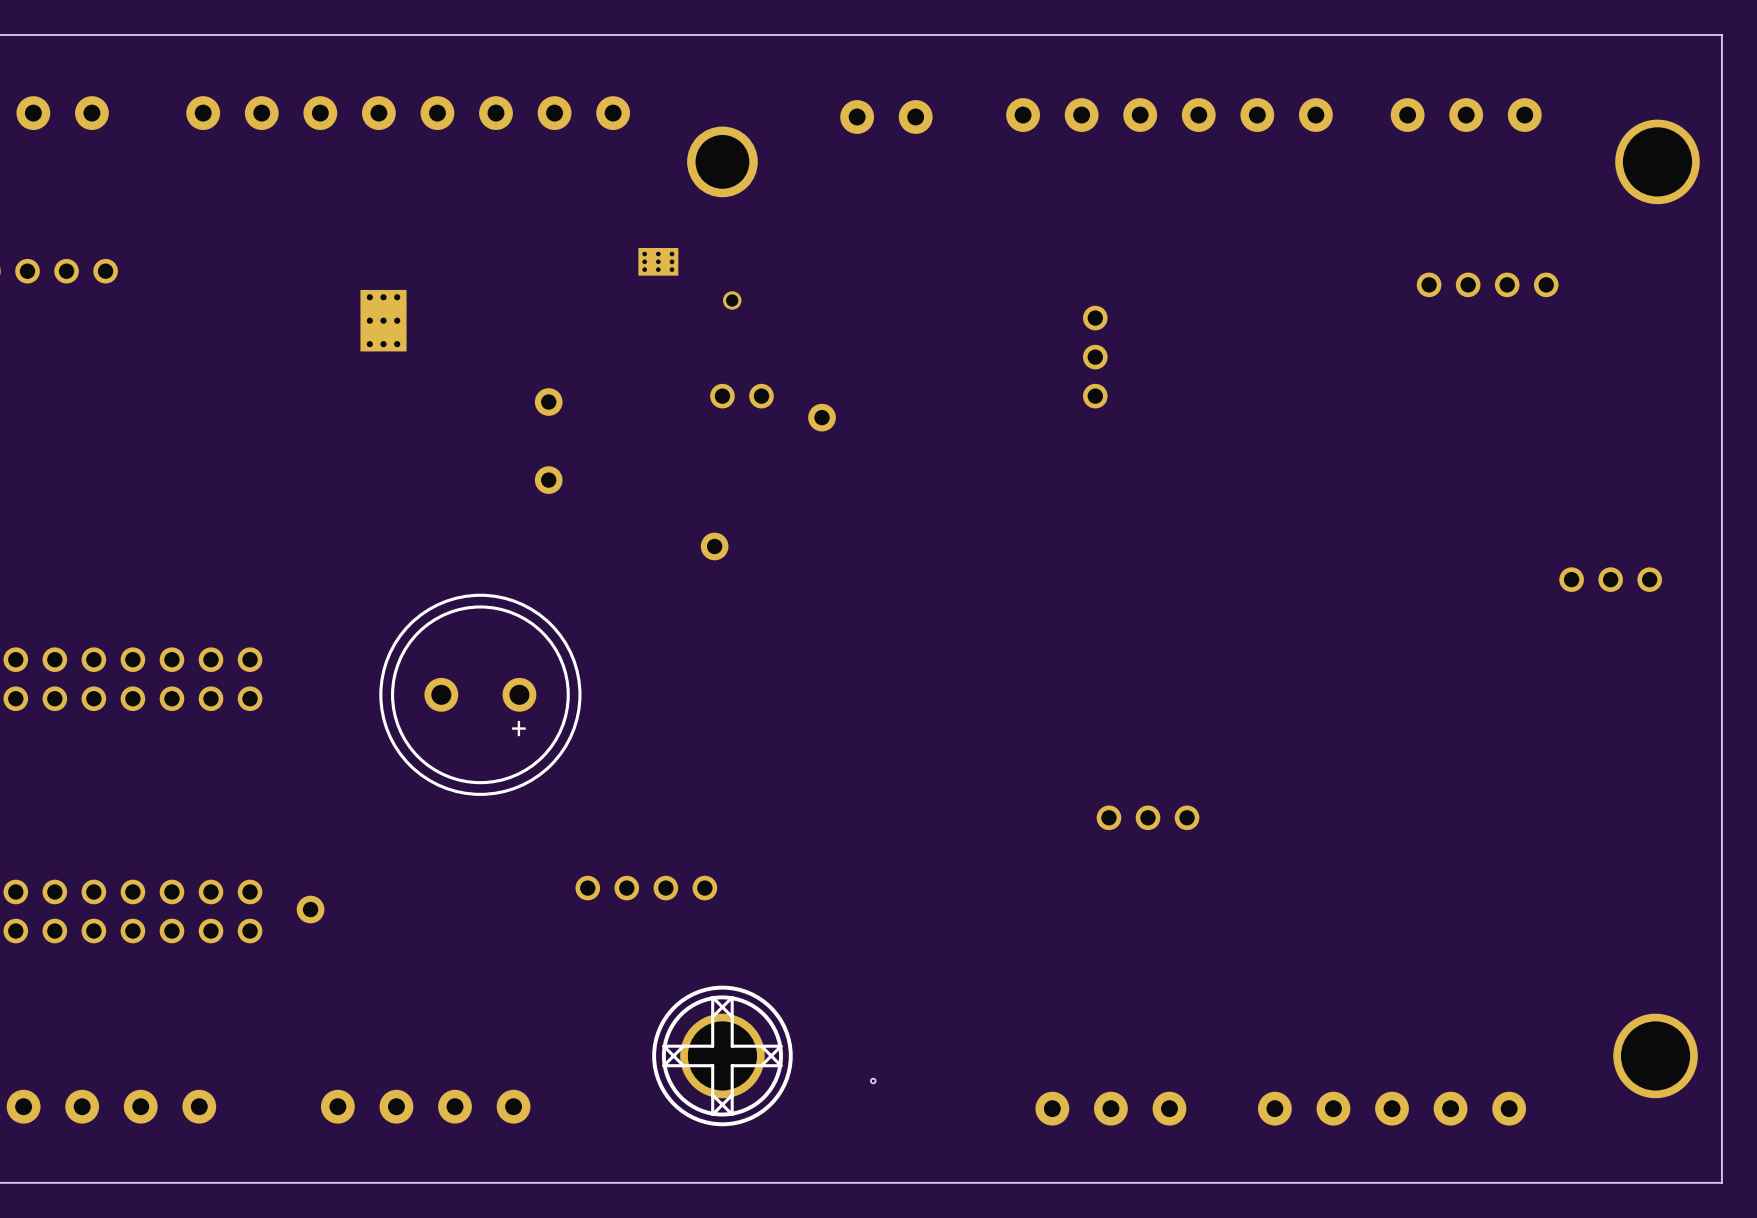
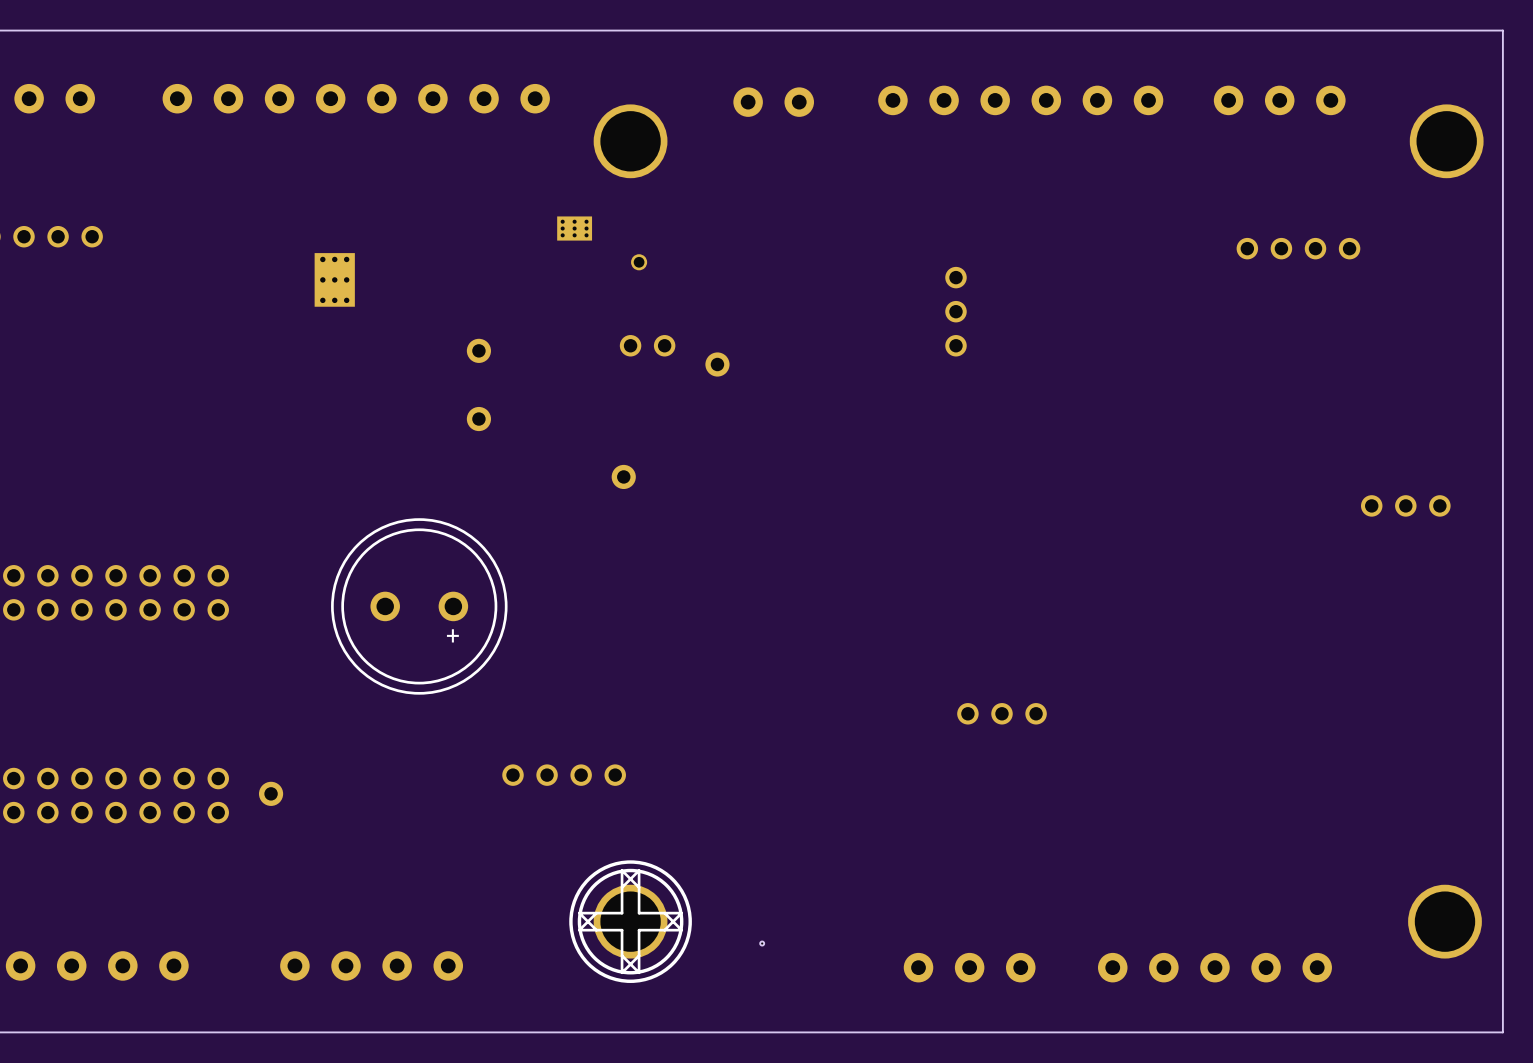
part footprint: [687, 126, 758, 198] -> [593, 104, 668, 179]

